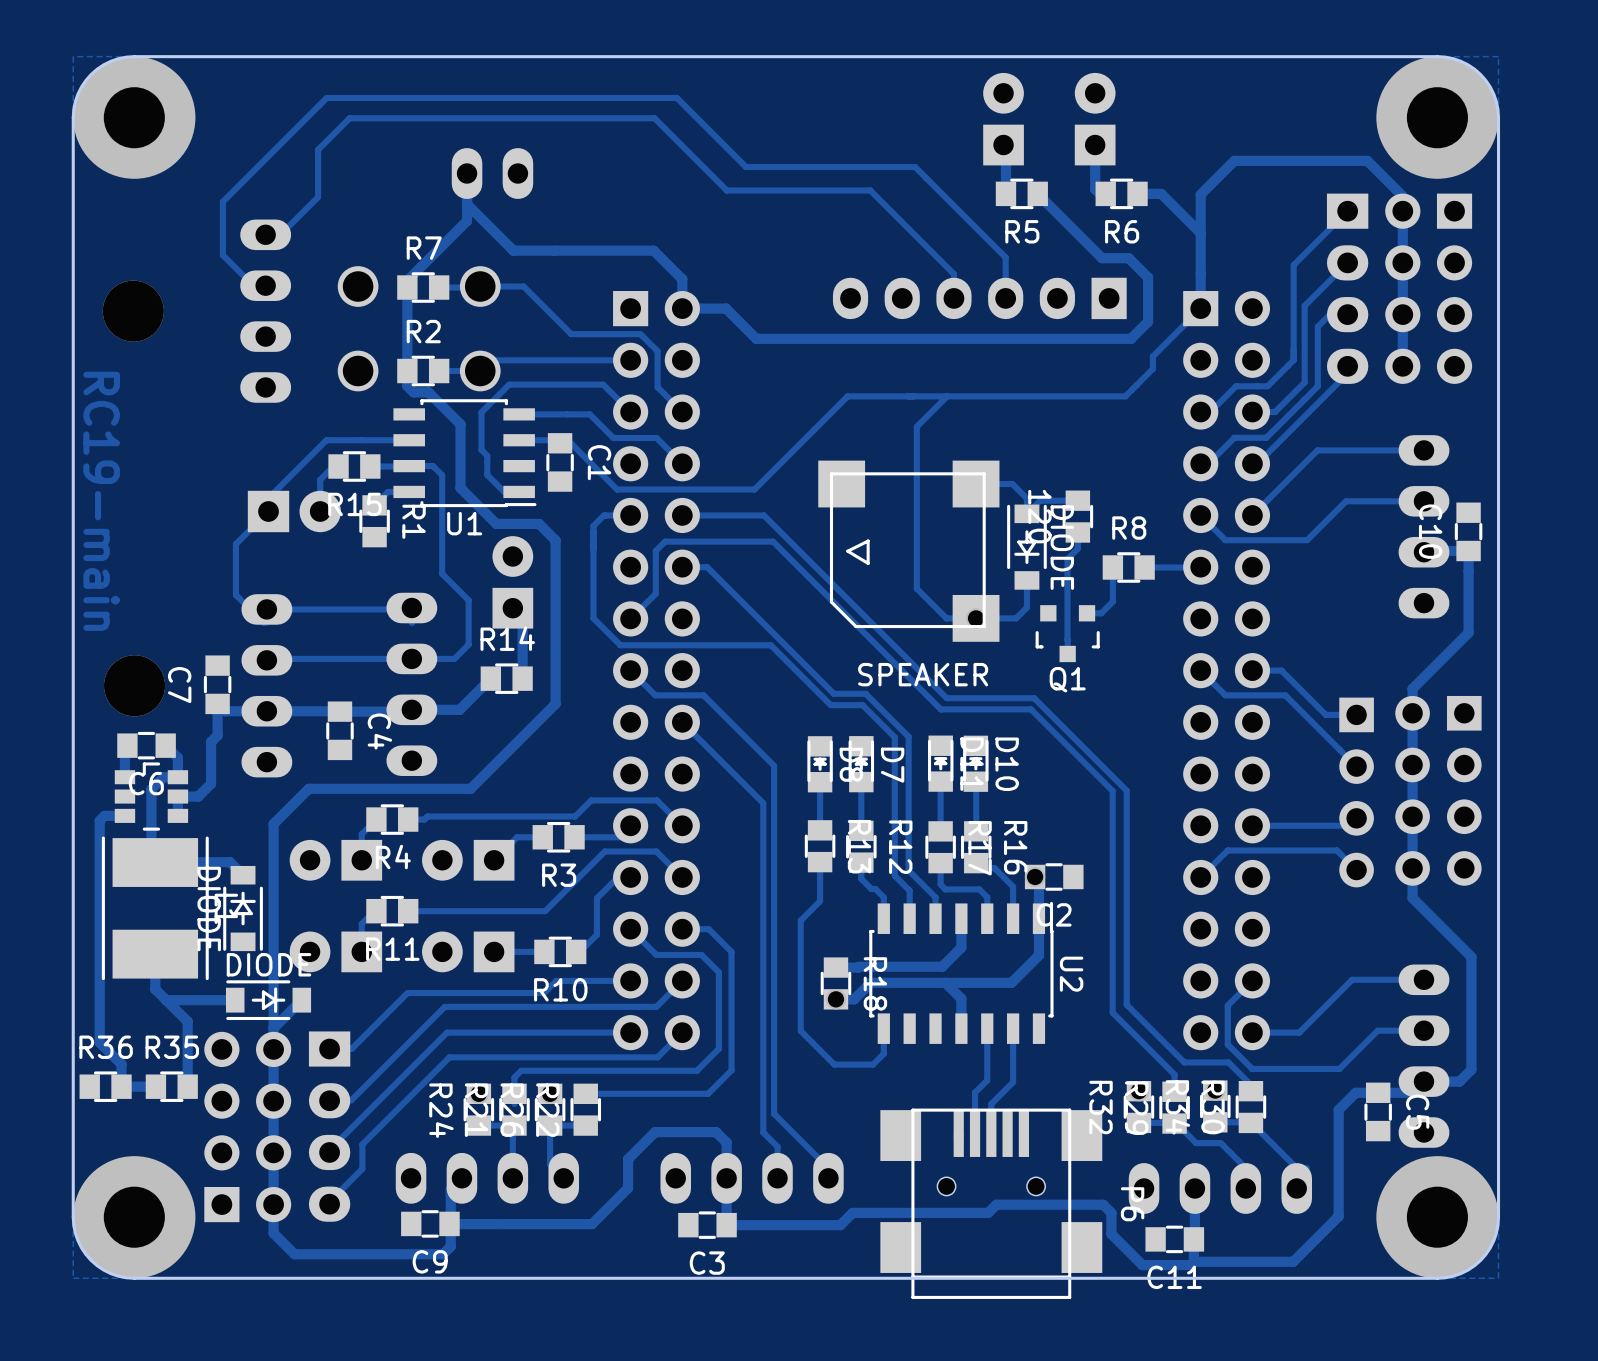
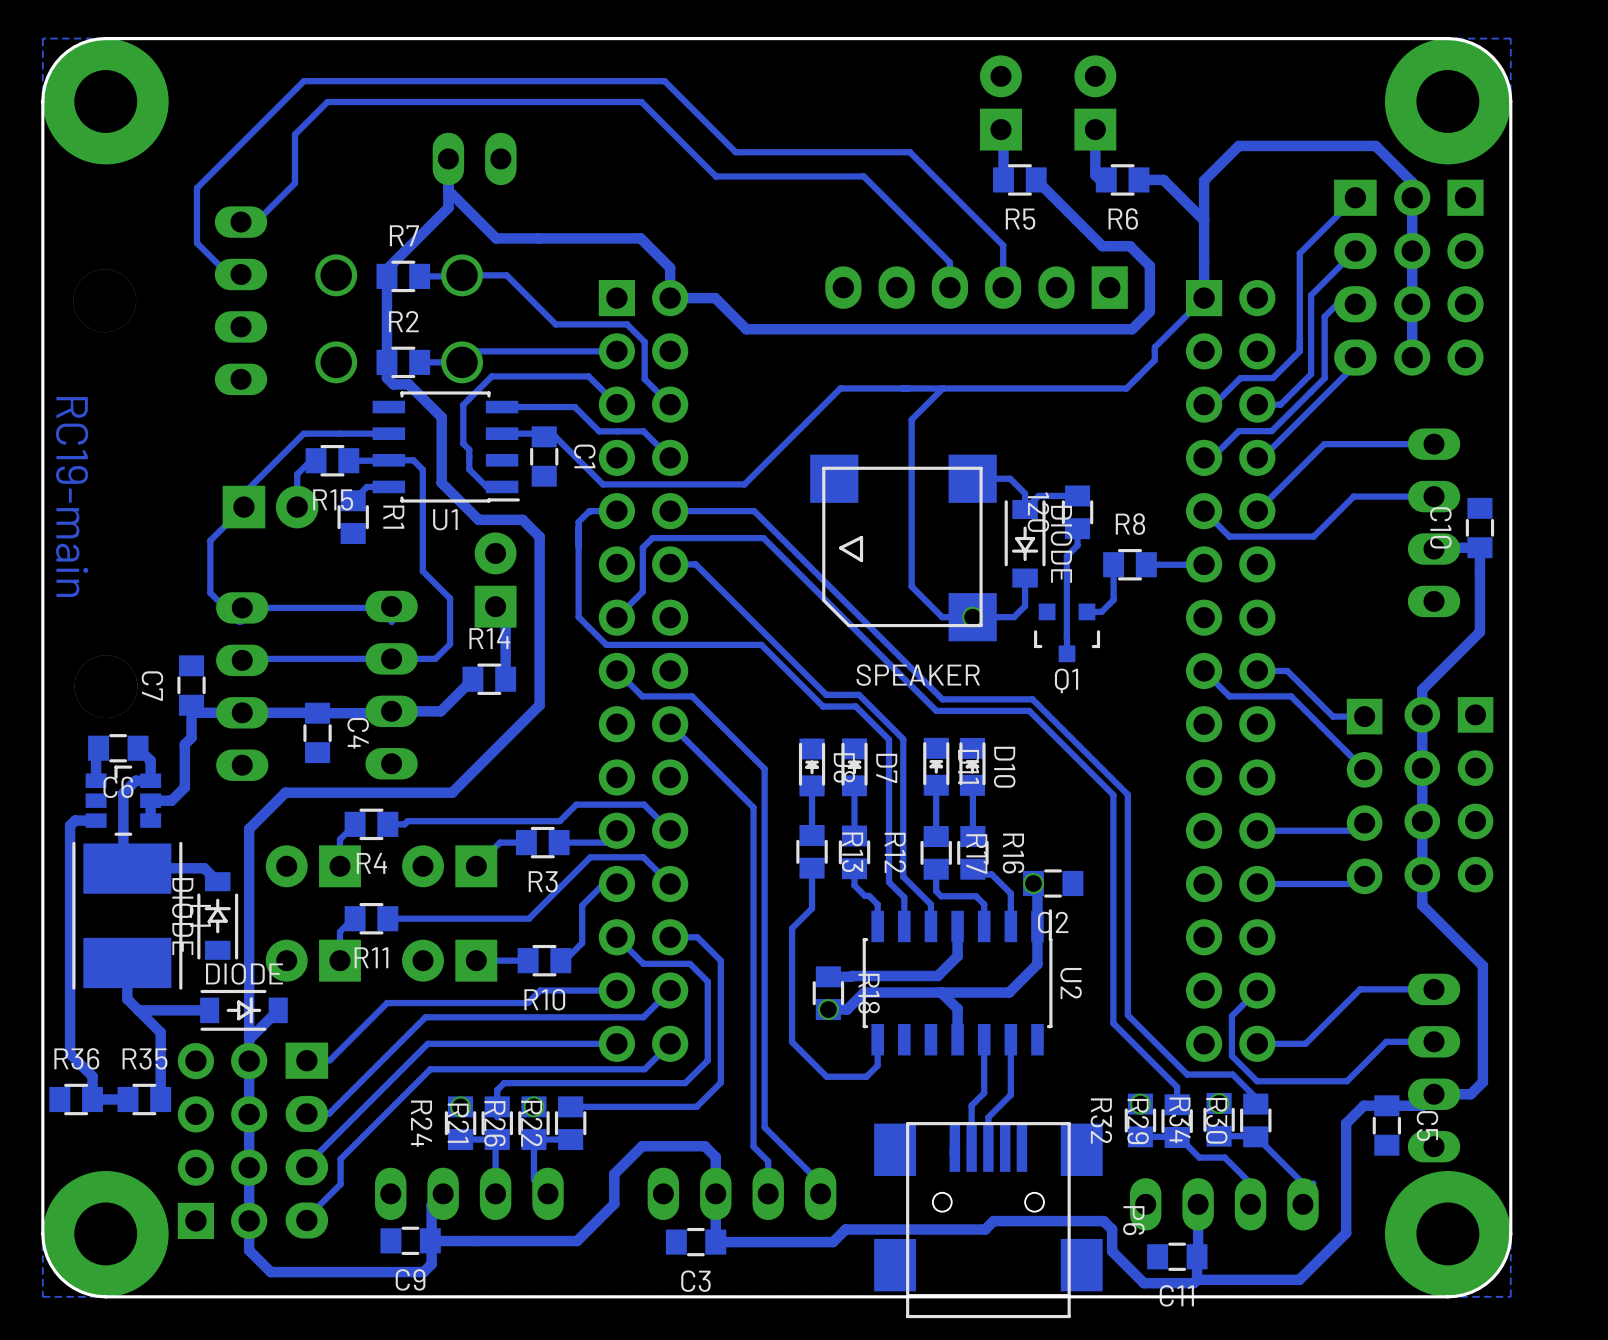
track: (1356, 870) (1337, 850) (1227, 850) (1200, 877) -> (1364, 876) (1356, 884) (1273, 884)

